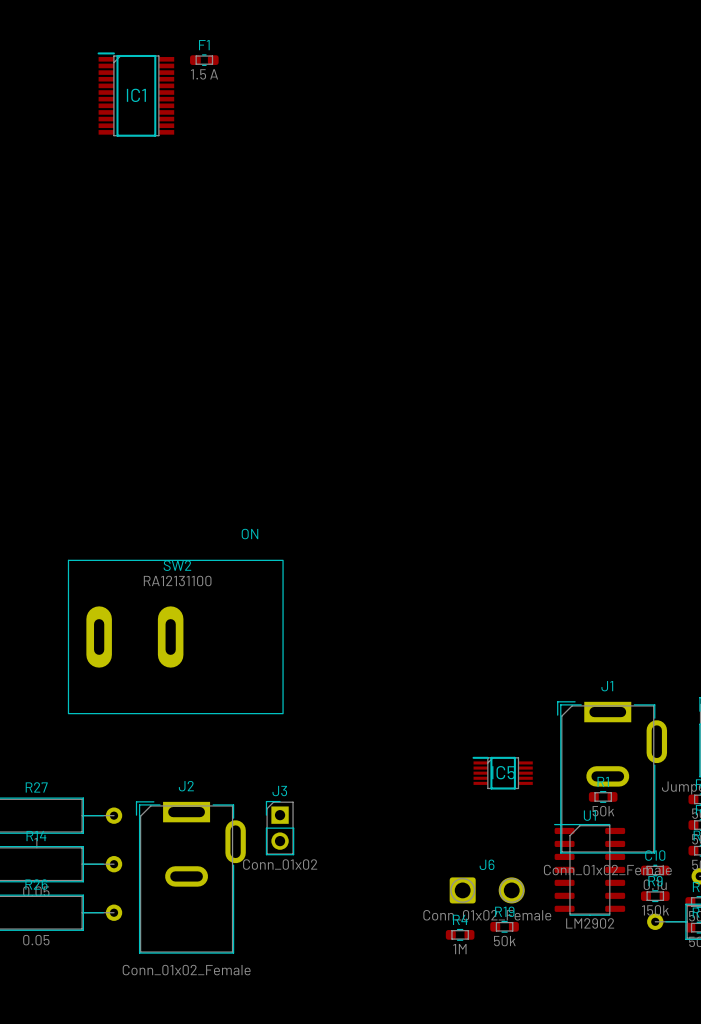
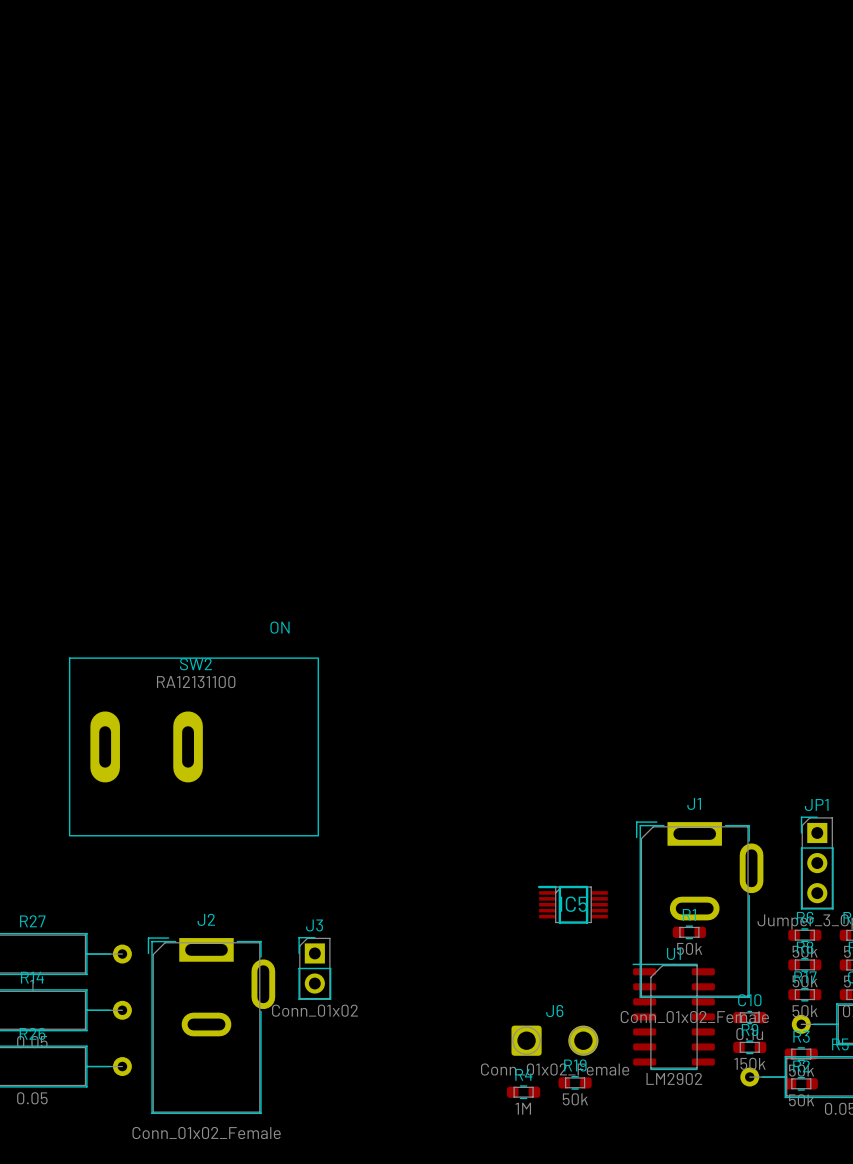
F1: 1.5 A (204, 60) -> none
IC1: (135, 94) -> none

